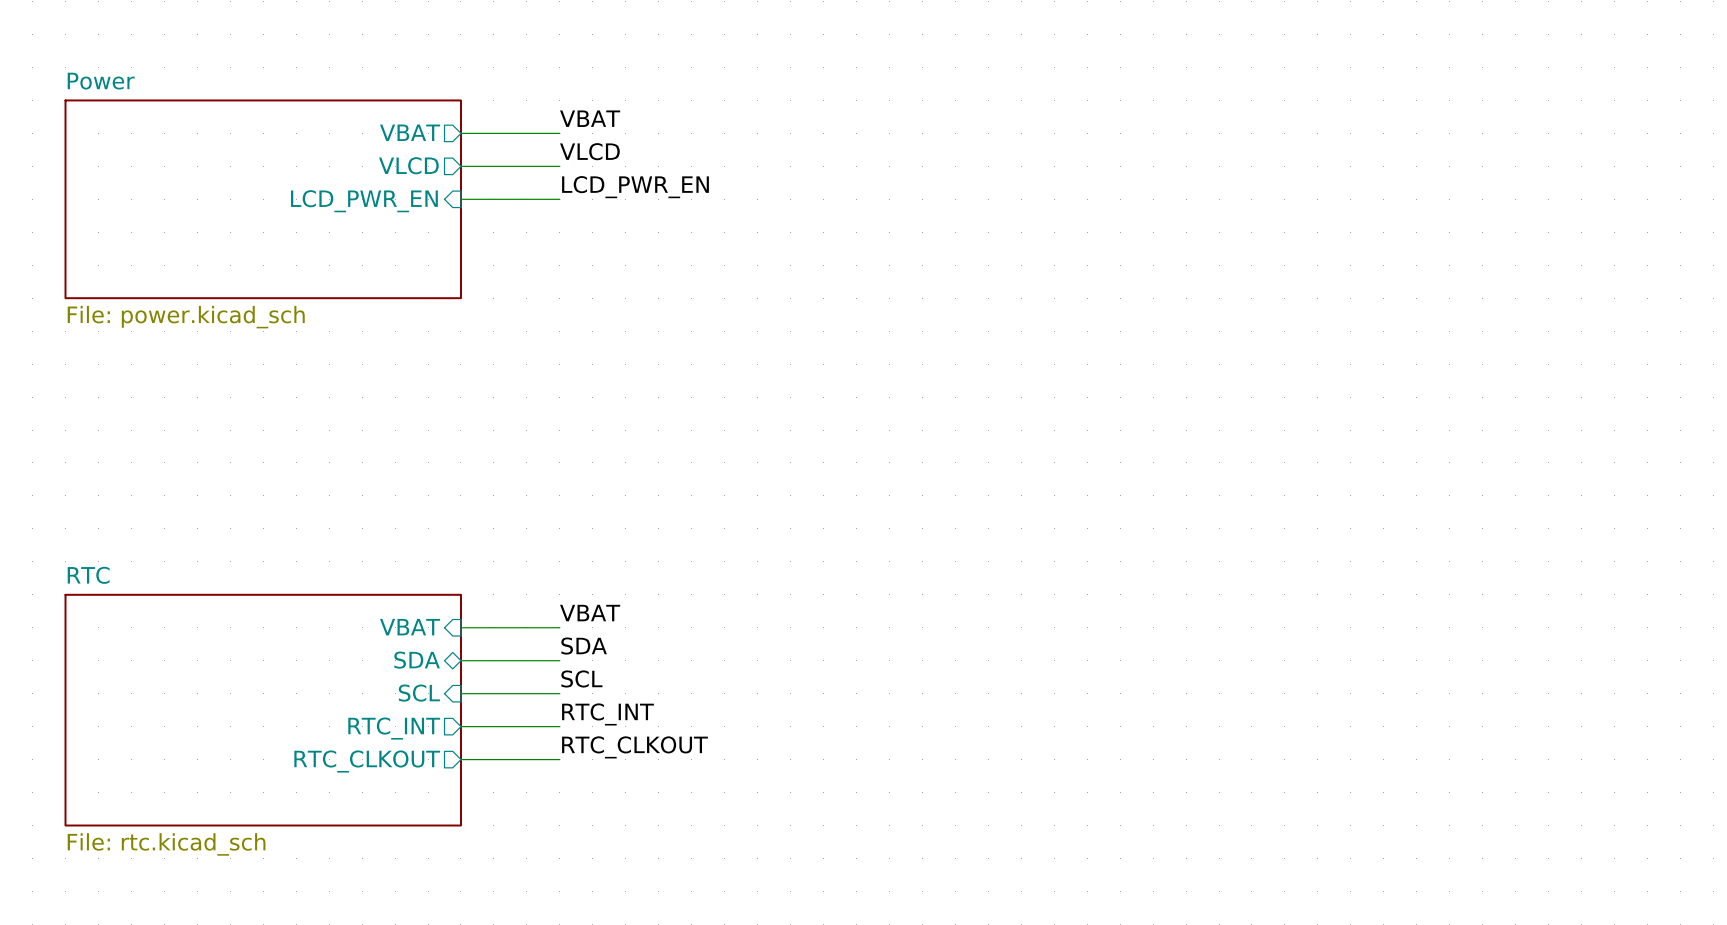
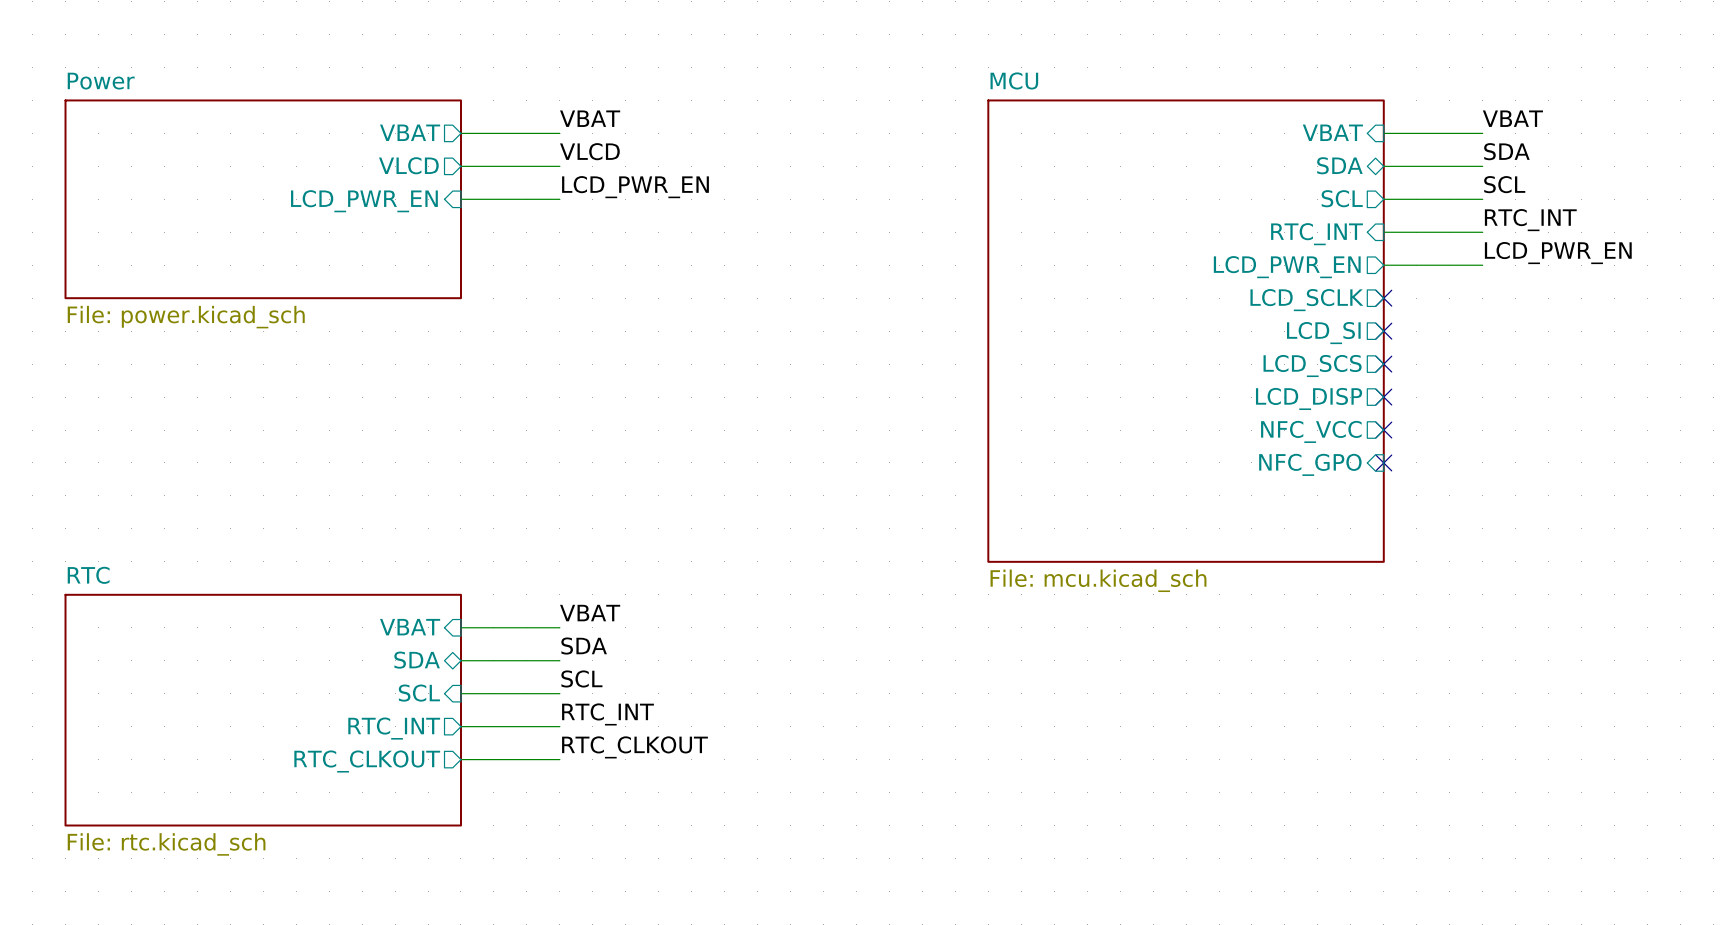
label: none -> VBAT (1512, 118)
sheet pin: none -> VBAT (1332, 132)
wire: none -> (1383, 133) (1482, 133)
label: none -> SDA (1506, 151)
sheet pin: none -> SDA (1339, 165)
wire: none -> (1383, 166) (1482, 166)
label: none -> SCL (1504, 184)
sheet pin: none -> SCL (1342, 198)
wire: none -> (1383, 199) (1482, 199)
label: none -> RTC_INT (1530, 220)
wire: none -> (1383, 232) (1482, 232)
sheet pin: none -> RTC_INT (1317, 234)
label: none -> LCD_PWR_EN (1558, 253)
wire: none -> (1383, 265) (1482, 265)
sheet pin: none -> LCD_PWR_EN (1287, 267)
no-connect mark: none -> (1383, 298)
sheet pin: none -> LCD_SCLK (1306, 300)
sheet MCU: none -> File: mcu.kicad_sch (1186, 331)
no-connect mark: none -> (1383, 331)
sheet pin: none -> LCD_SI (1323, 333)
no-connect mark: none -> (1383, 364)
sheet pin: none -> LCD_SCS (1312, 366)
no-connect mark: none -> (1383, 397)
sheet pin: none -> LCD_DISP (1309, 398)
no-connect mark: none -> (1383, 430)
sheet pin: none -> NFC_VCC (1311, 431)
no-connect mark: none -> (1383, 462)
sheet pin: none -> NFC_GPO (1310, 464)

